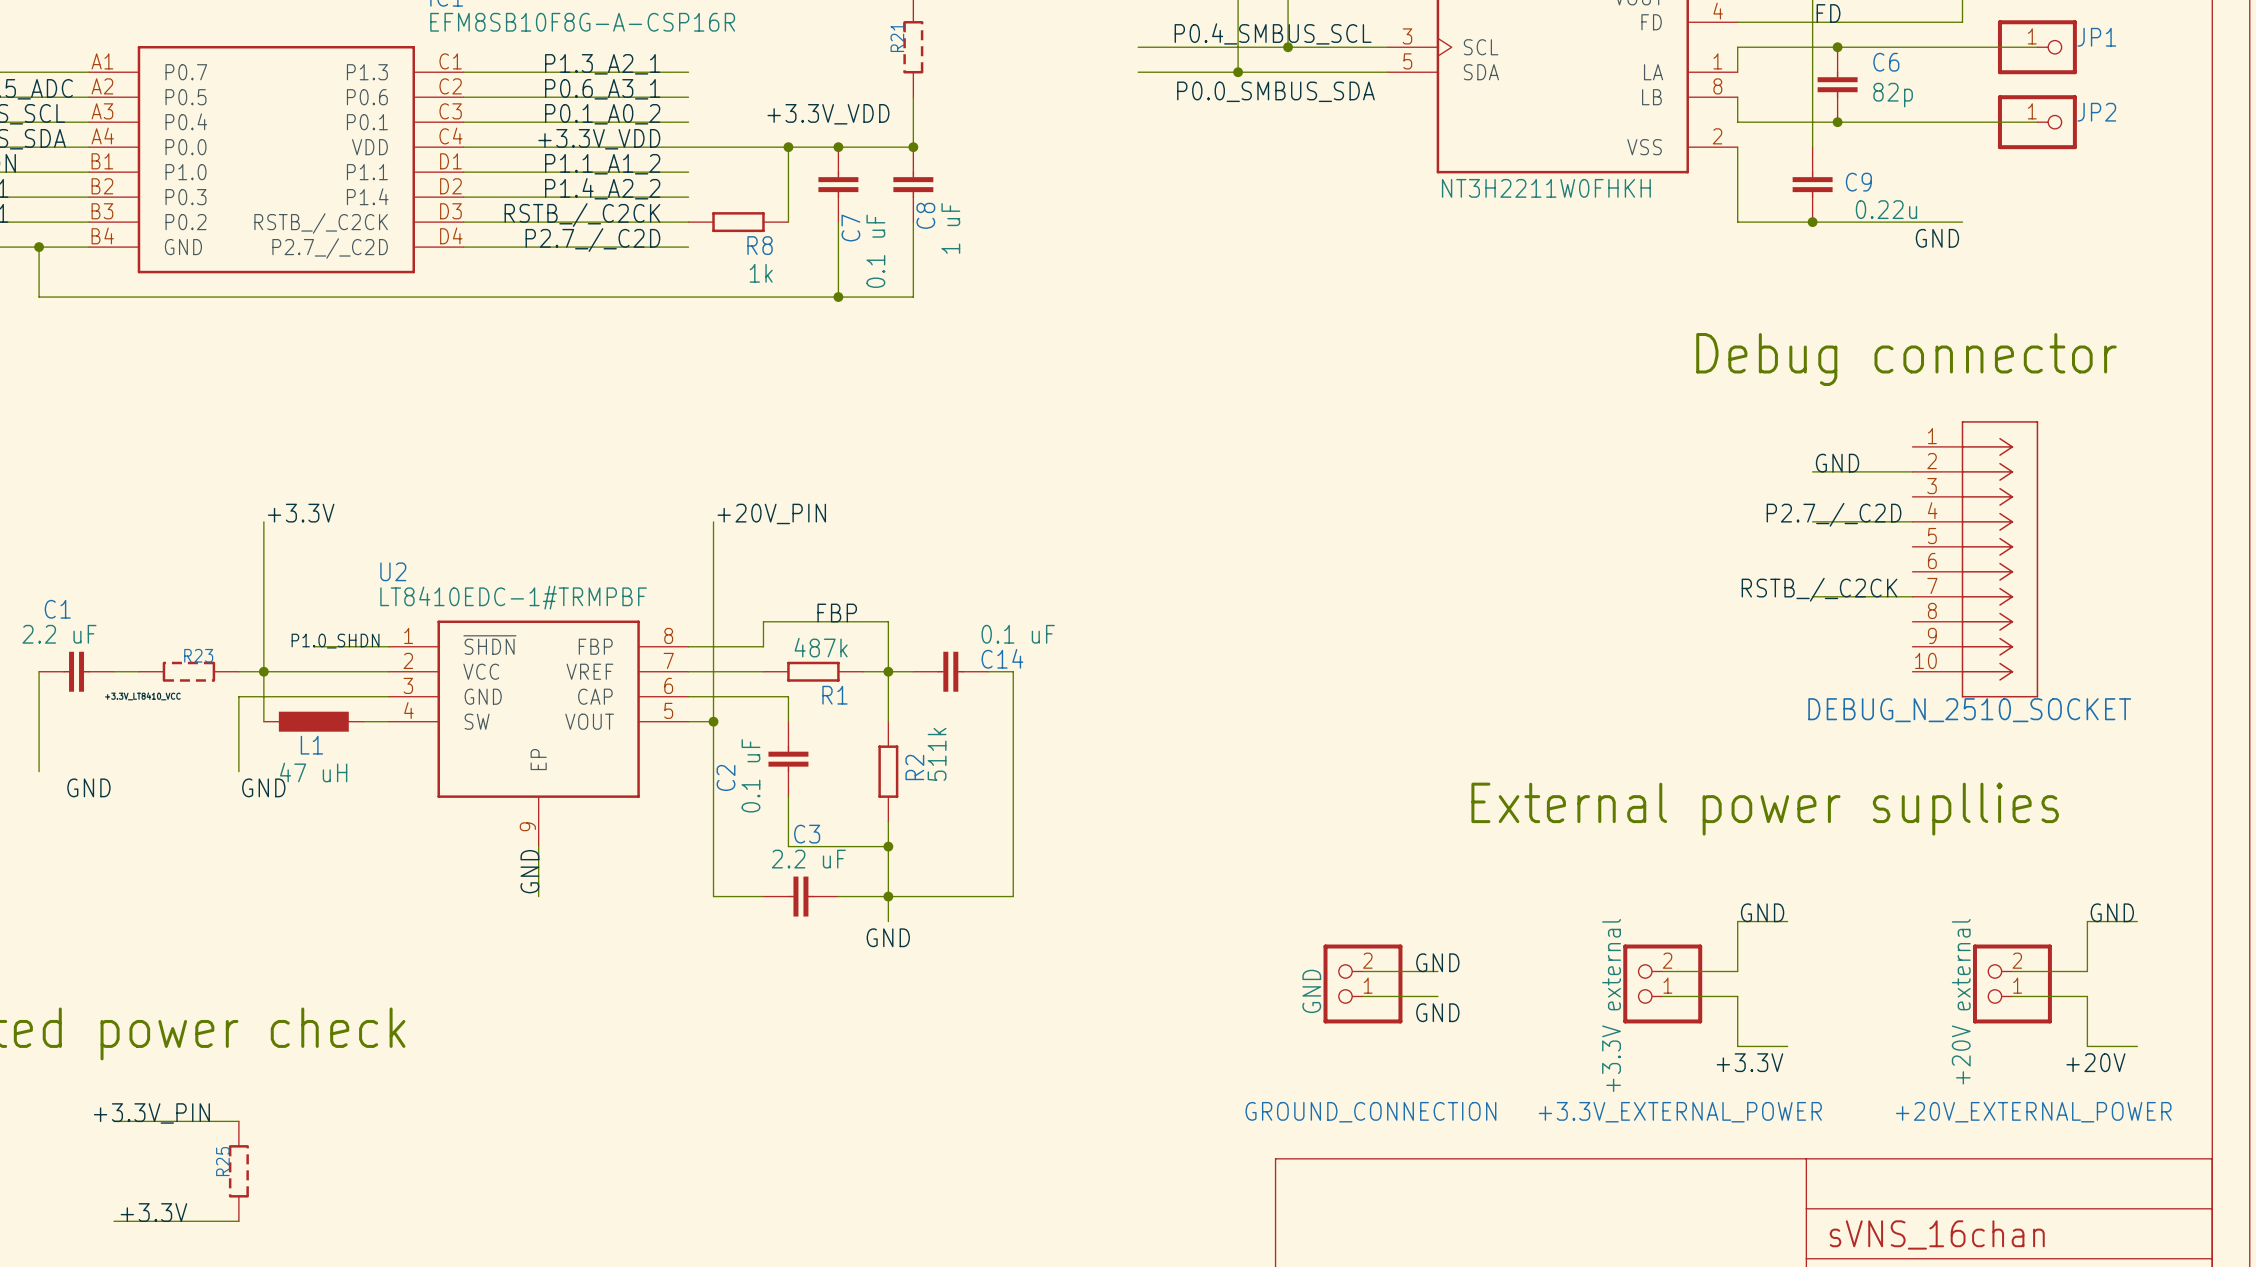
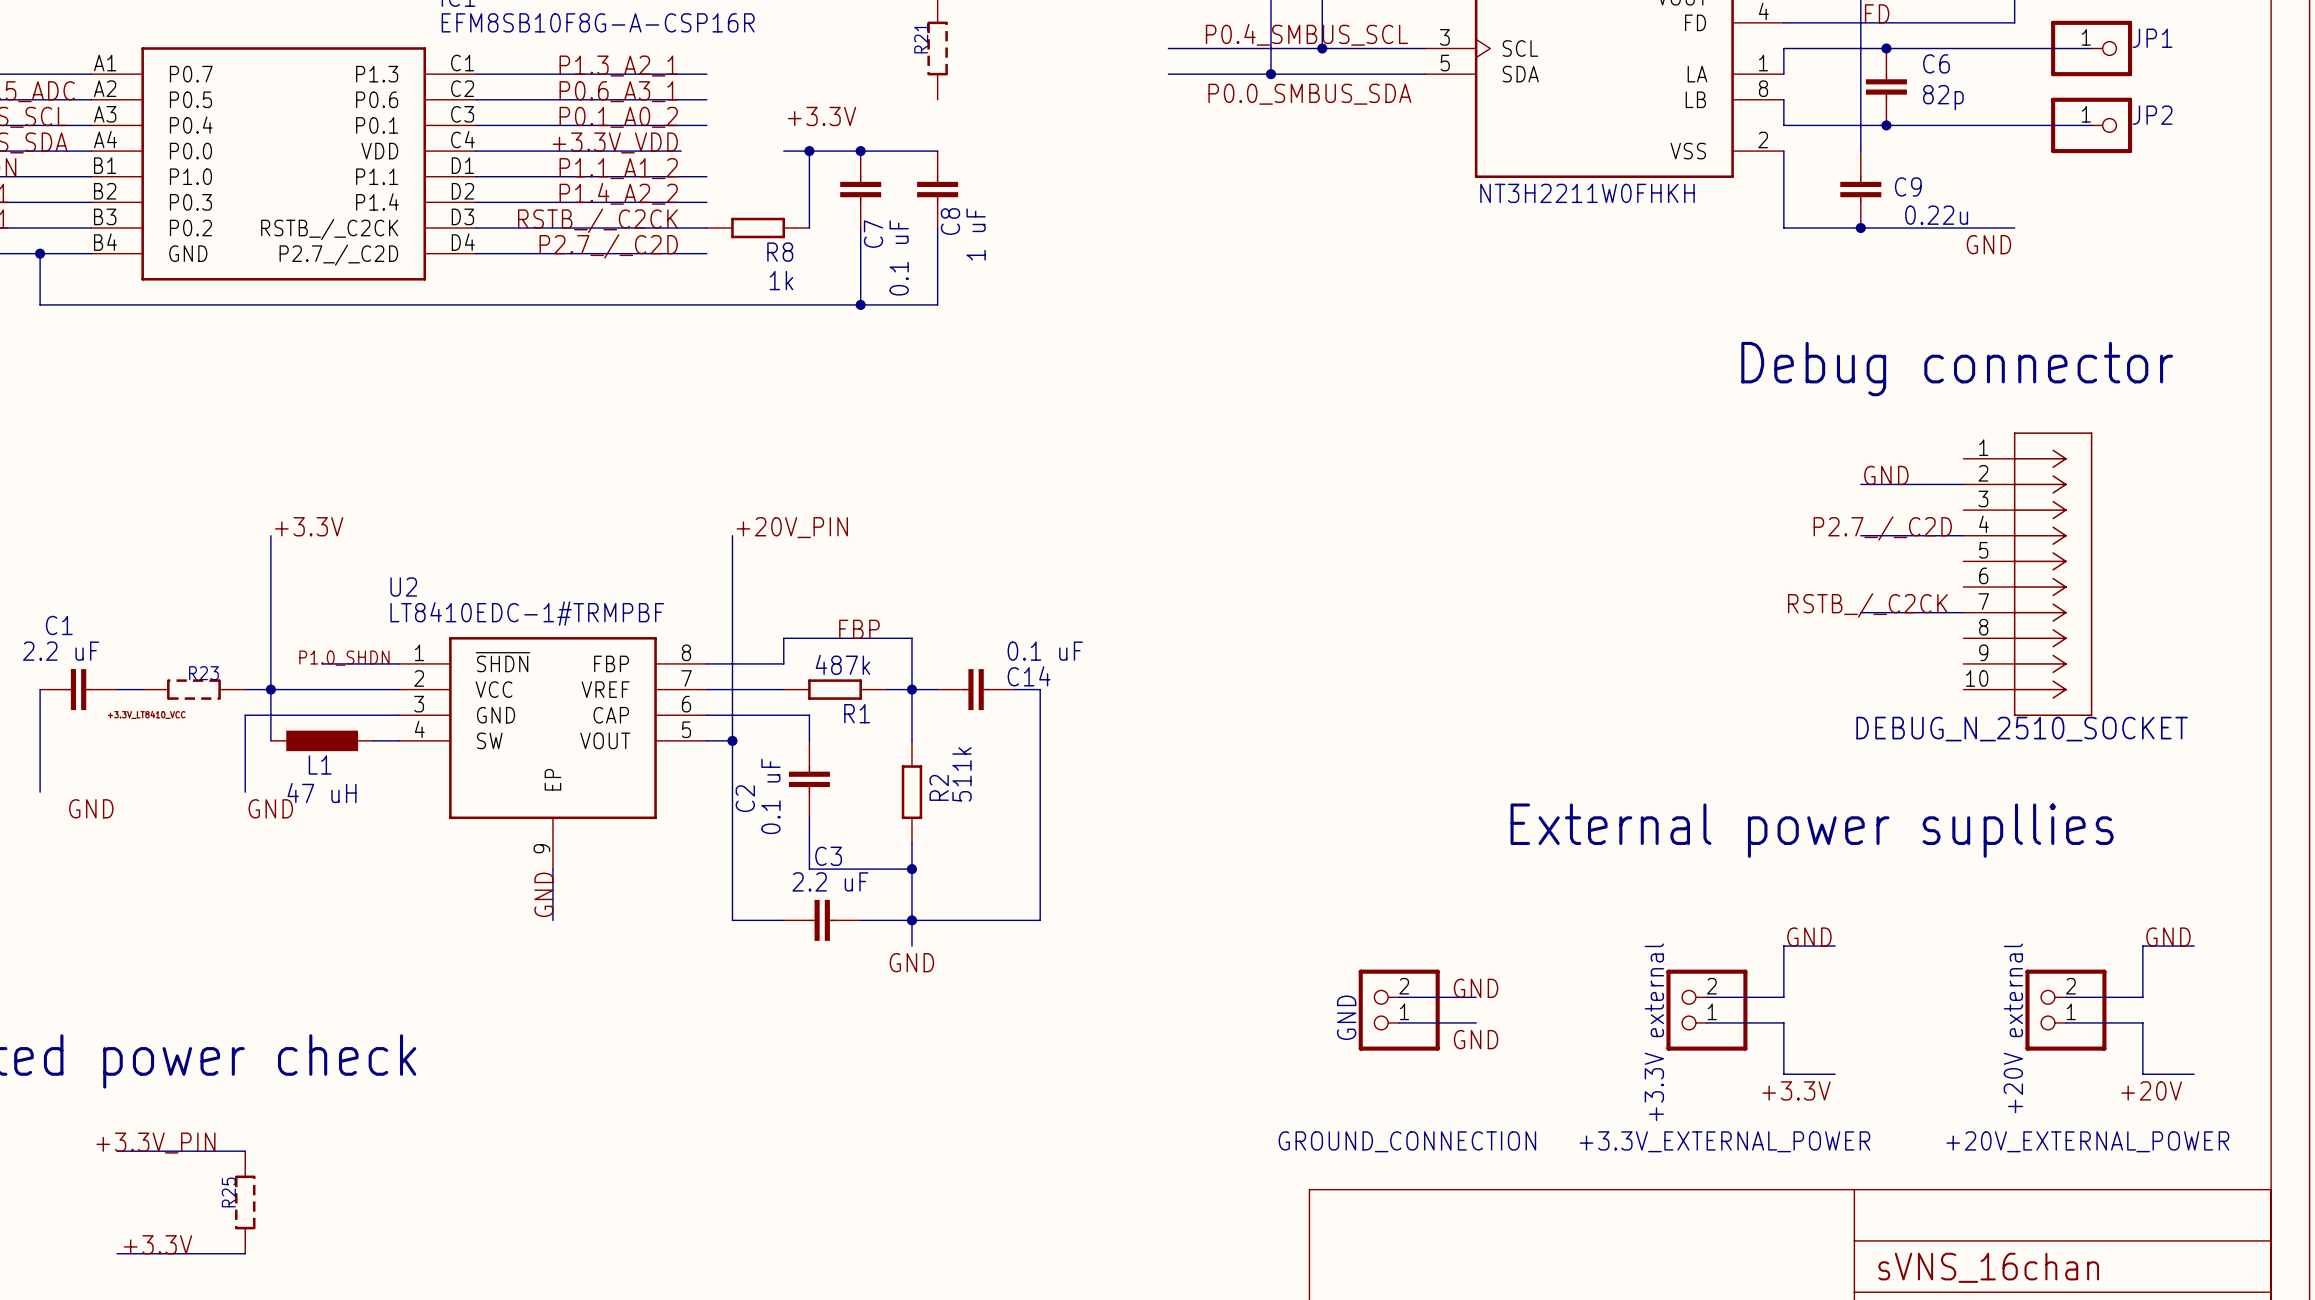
wire: (913, 97) (913, 147) -> none
label: +3.3V_VDD (828, 114) -> +3.3V (822, 116)
wire: (663, 147) (763, 147) -> none
junction: (913, 147) -> none

